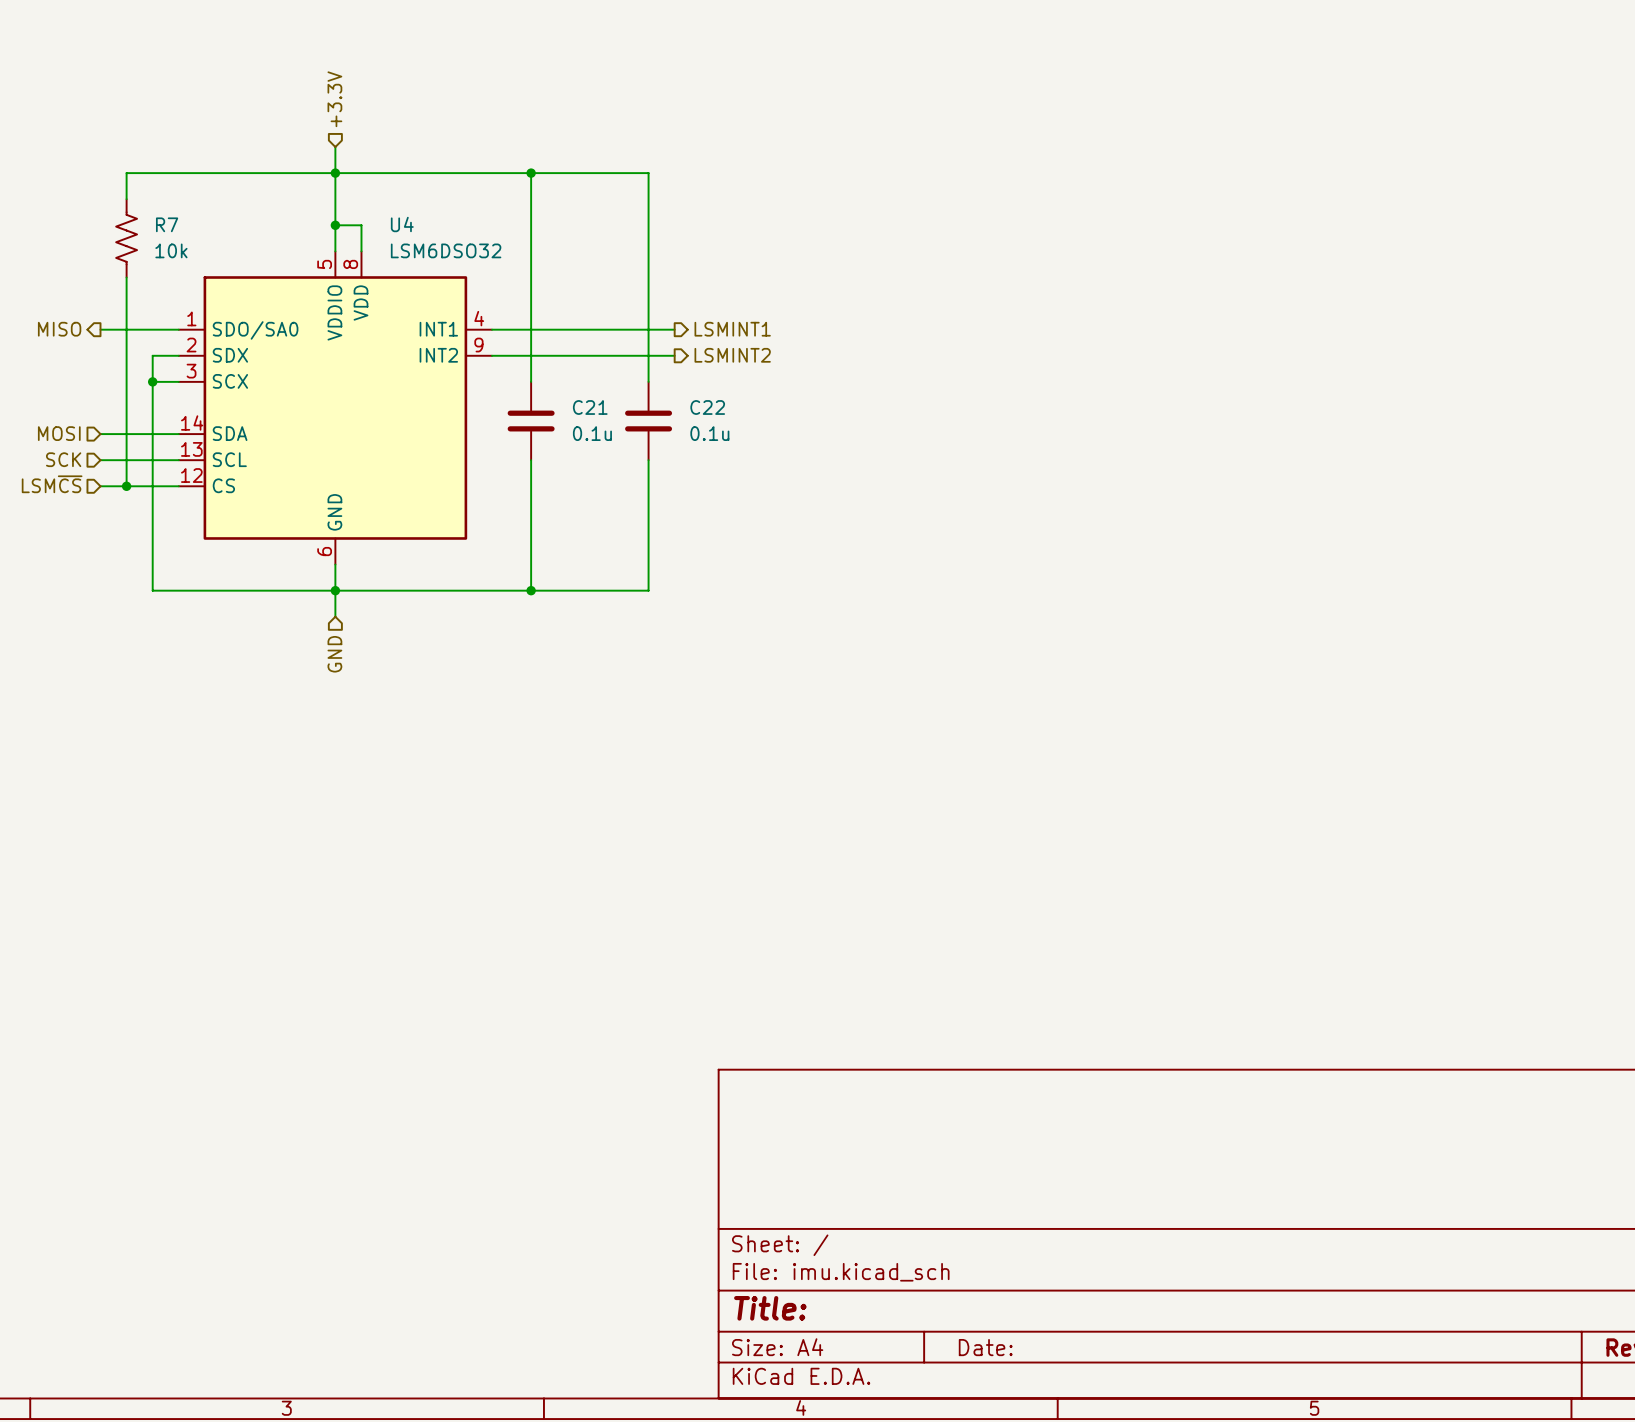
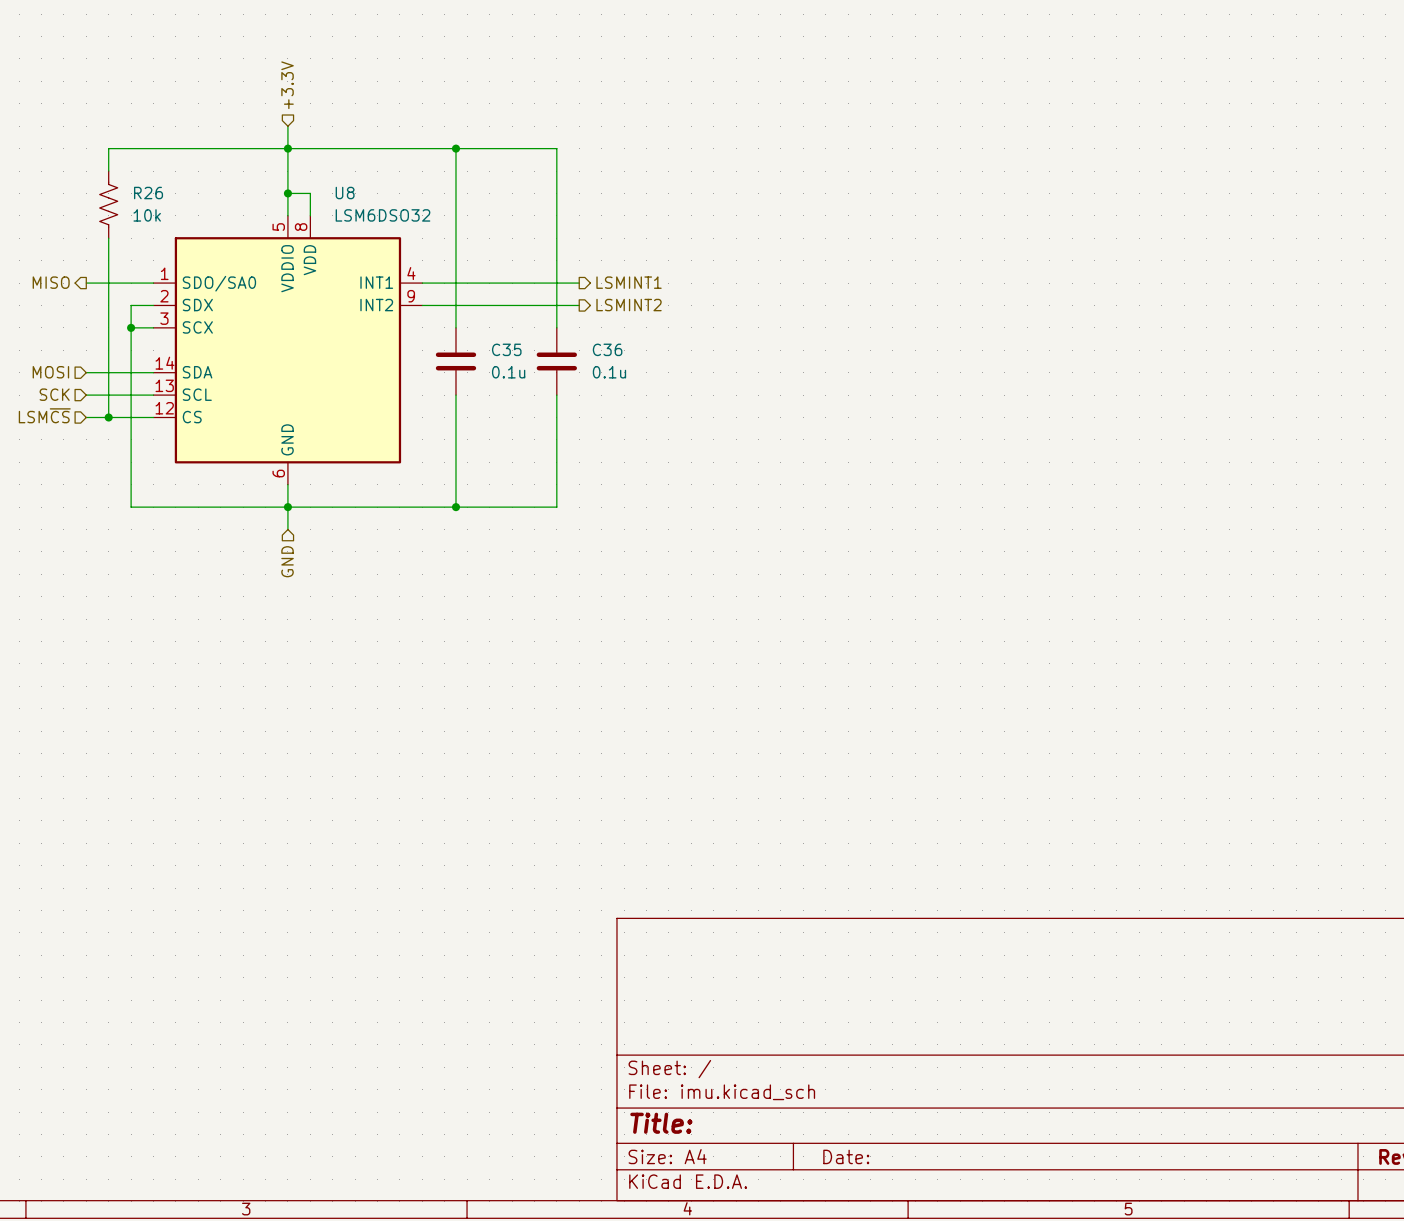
R7 name: R7 (167, 224) -> R26 (148, 193)
U4 name: U4 (402, 224) -> U8 (345, 193)
C21 name: C21 (590, 407) -> C35 (506, 349)
C22 name: C22 (707, 407) -> C36 (607, 349)

